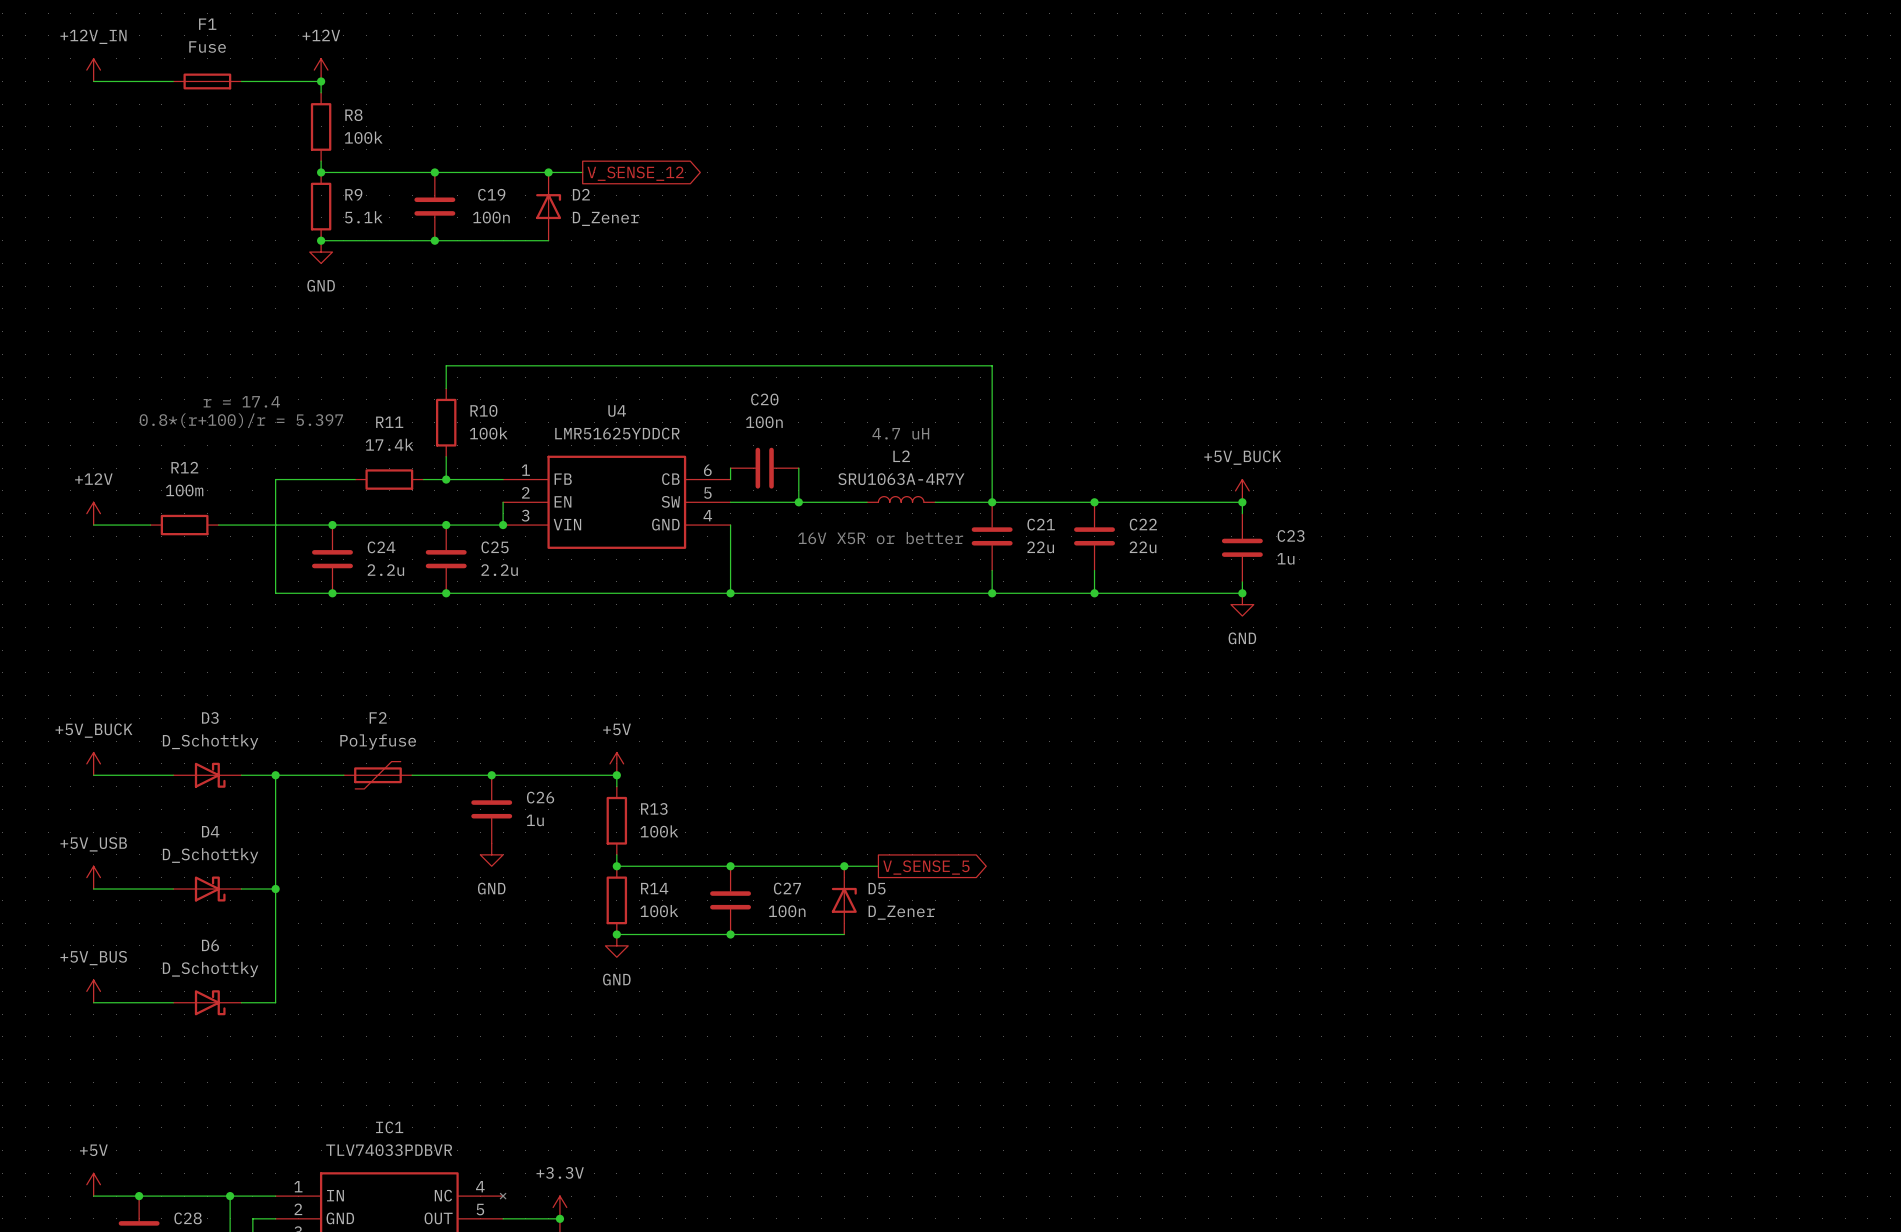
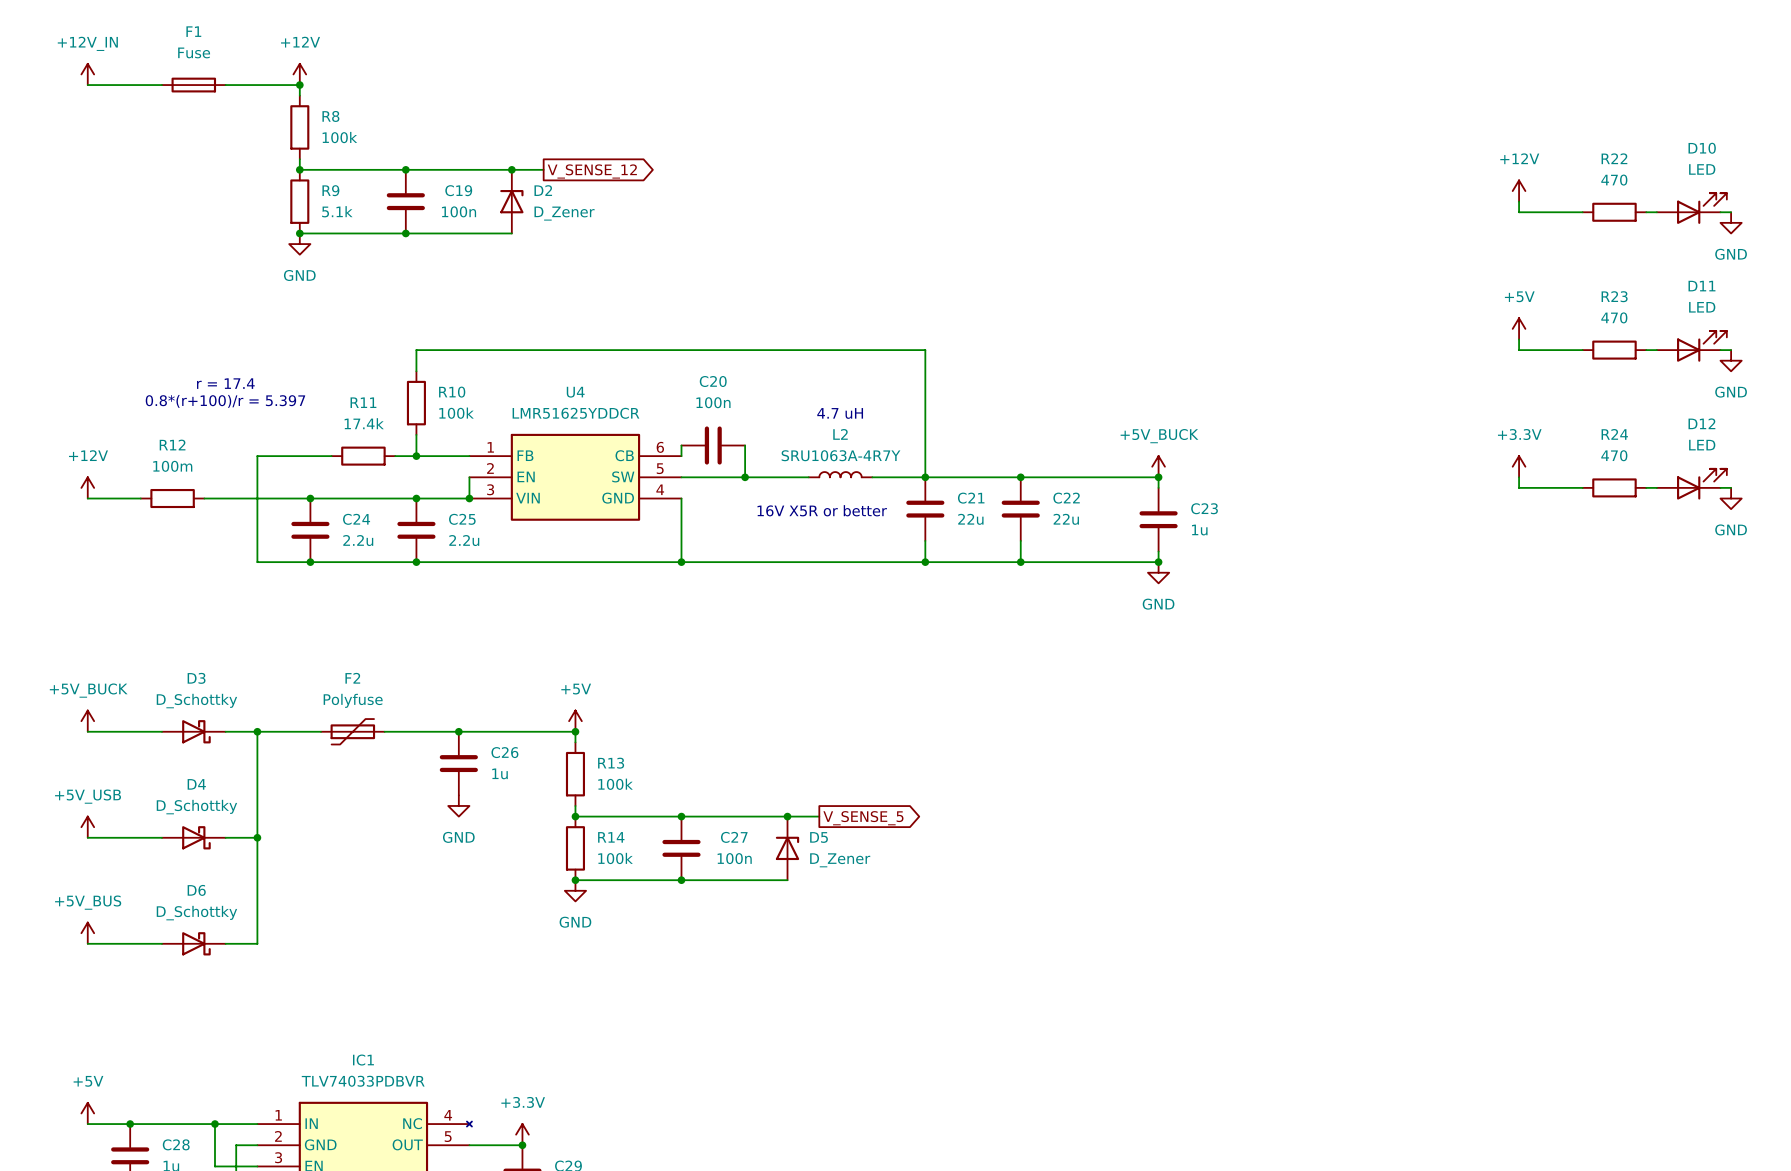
power symbol: none -> +12V (1519, 191)
wire: none -> (1519, 201) (1519, 212) (1582, 212)
D10: none -> LED (1691, 208)
R22: none -> 470 (1614, 212)
wire: none -> (1646, 212) (1656, 212)
wire: none -> (1720, 212) (1731, 212)
power symbol: none -> GND (1731, 222)
power symbol: none -> +5V (1519, 328)
wire: none -> (1519, 339) (1519, 350) (1582, 350)
D11: none -> LED (1691, 346)
R23: none -> 470 (1614, 350)
wire: none -> (1646, 350) (1656, 350)
wire: none -> (1720, 350) (1731, 350)
power symbol: none -> GND (1731, 360)
power symbol: none -> +3.3V (1519, 466)
wire: none -> (1519, 477) (1519, 487) (1582, 487)
D12: none -> LED (1691, 484)
R24: none -> 470 (1614, 487)
wire: none -> (1646, 487) (1656, 487)
wire: none -> (1720, 487) (1731, 487)
power symbol: none -> GND (1731, 498)

